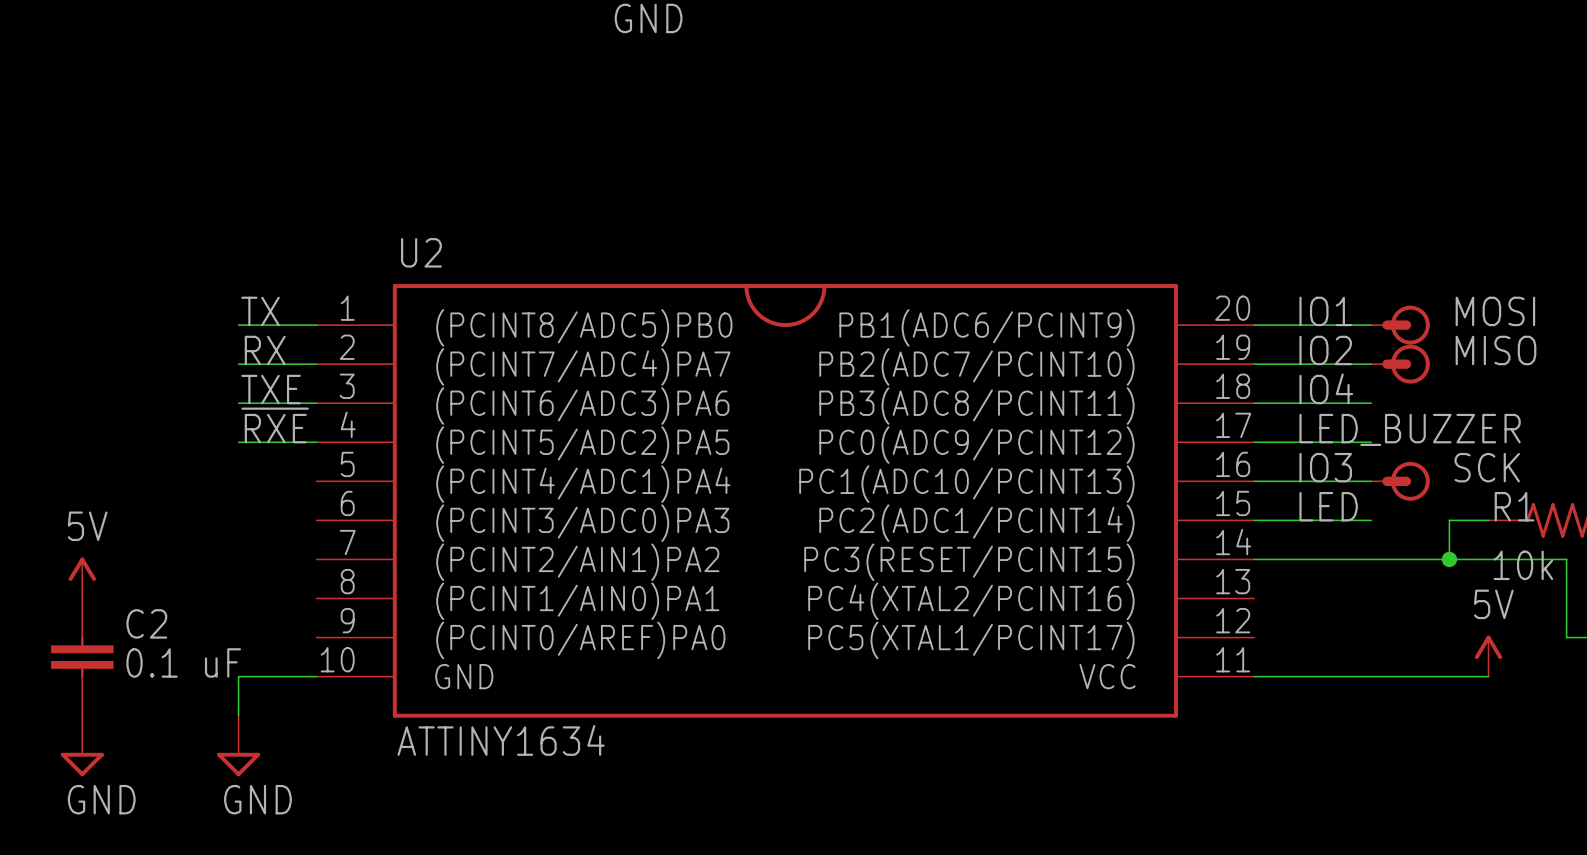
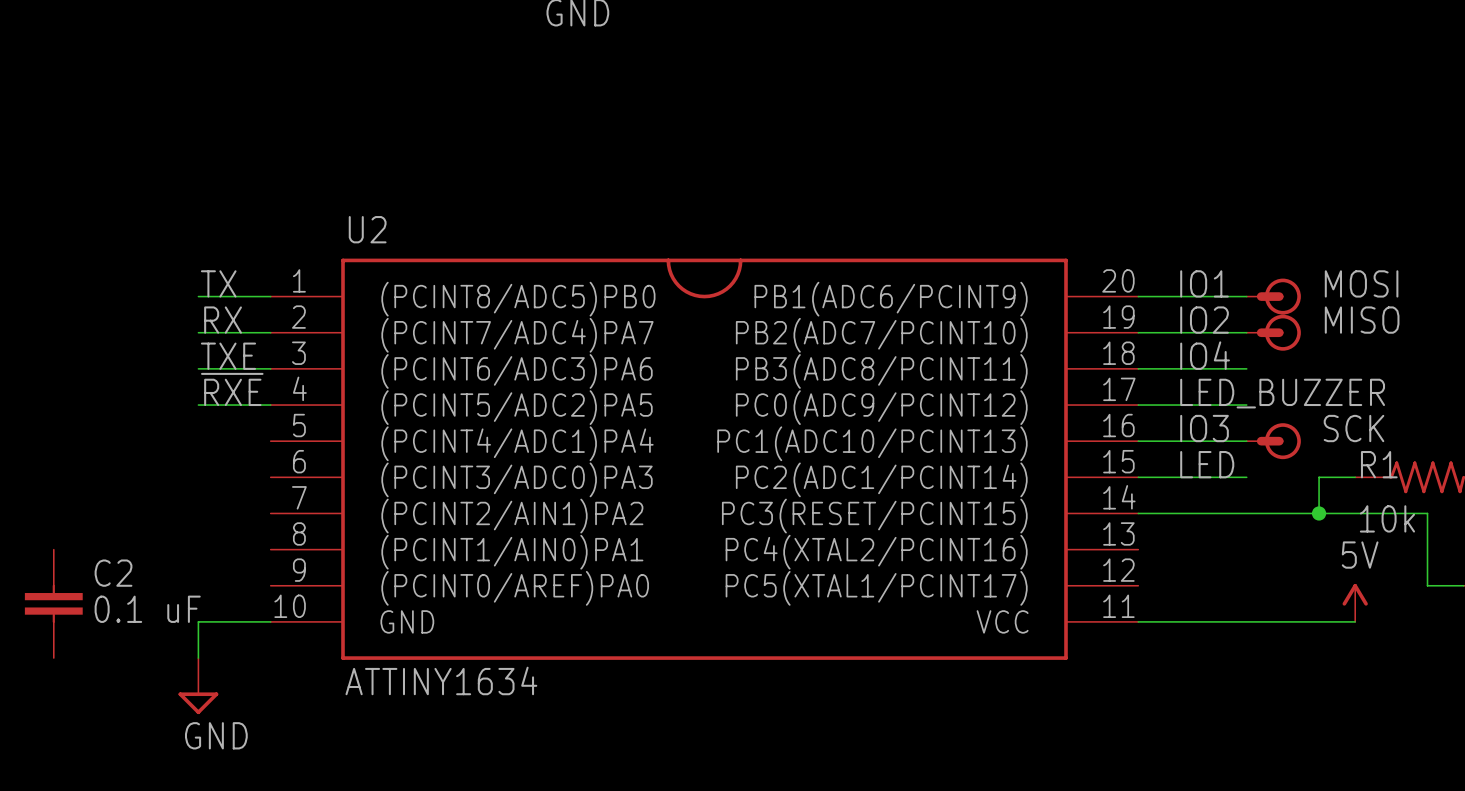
power symbol: 5V (82, 578) -> none
power symbol: GND (82, 745) -> none

